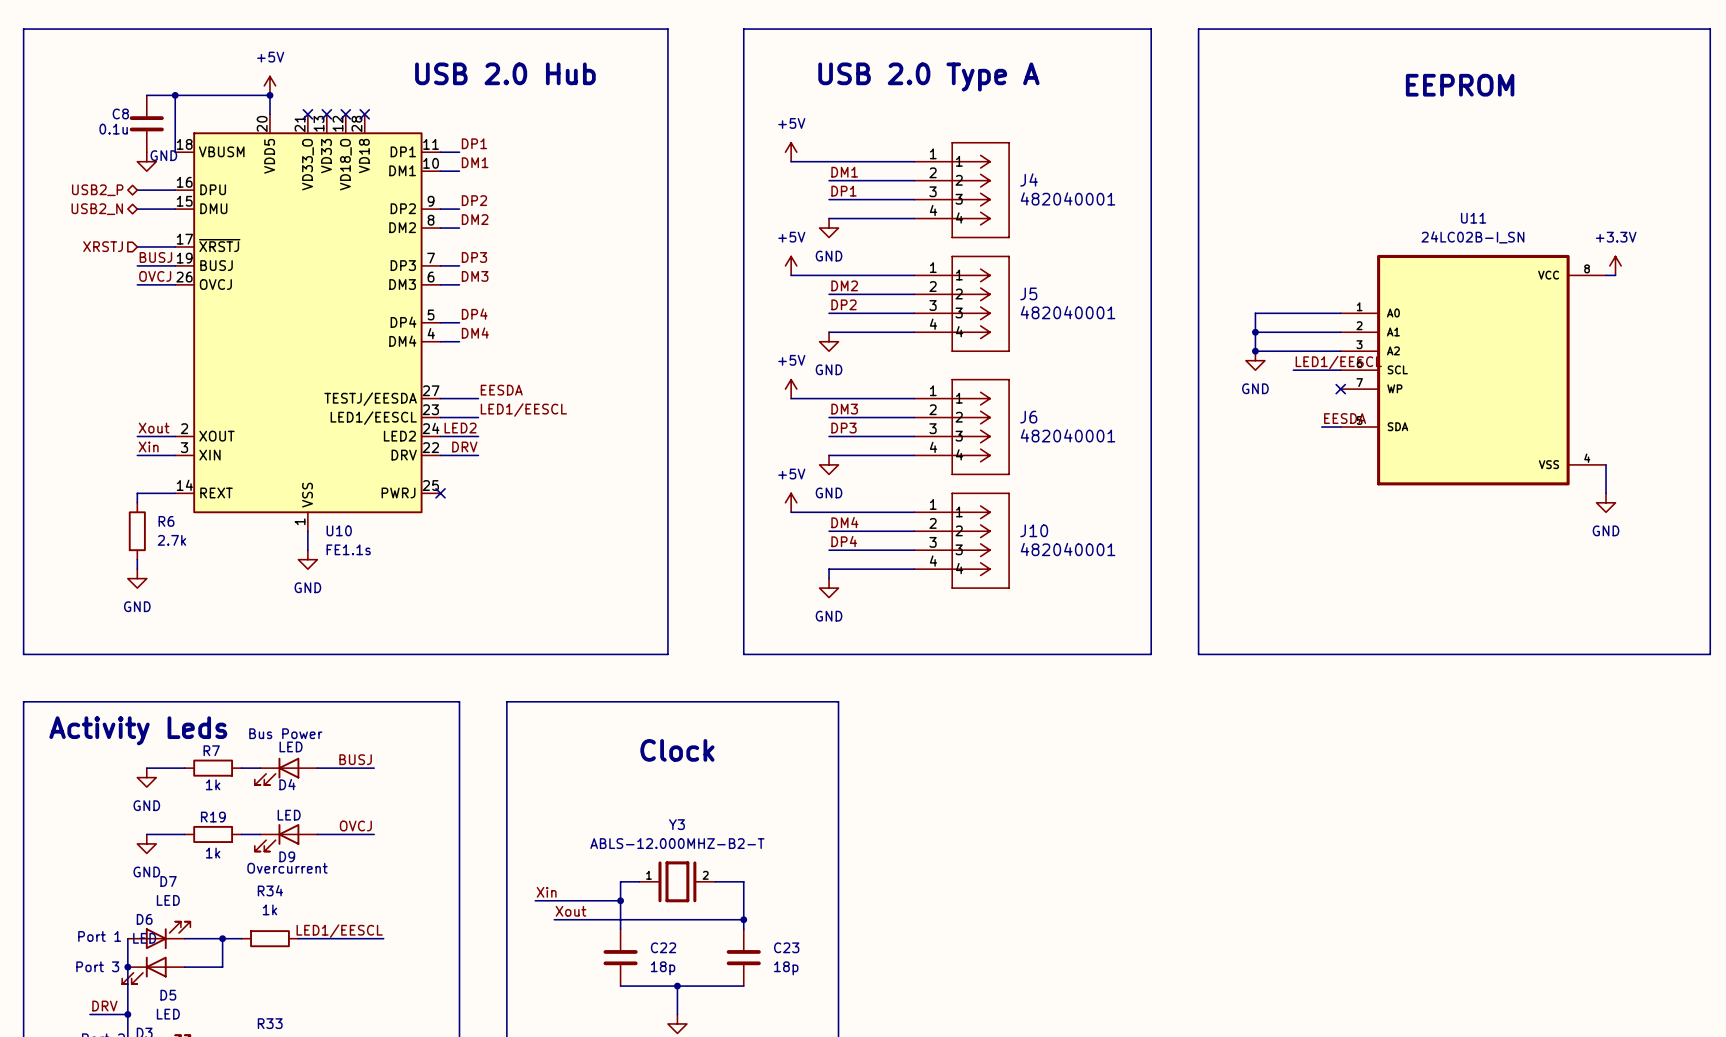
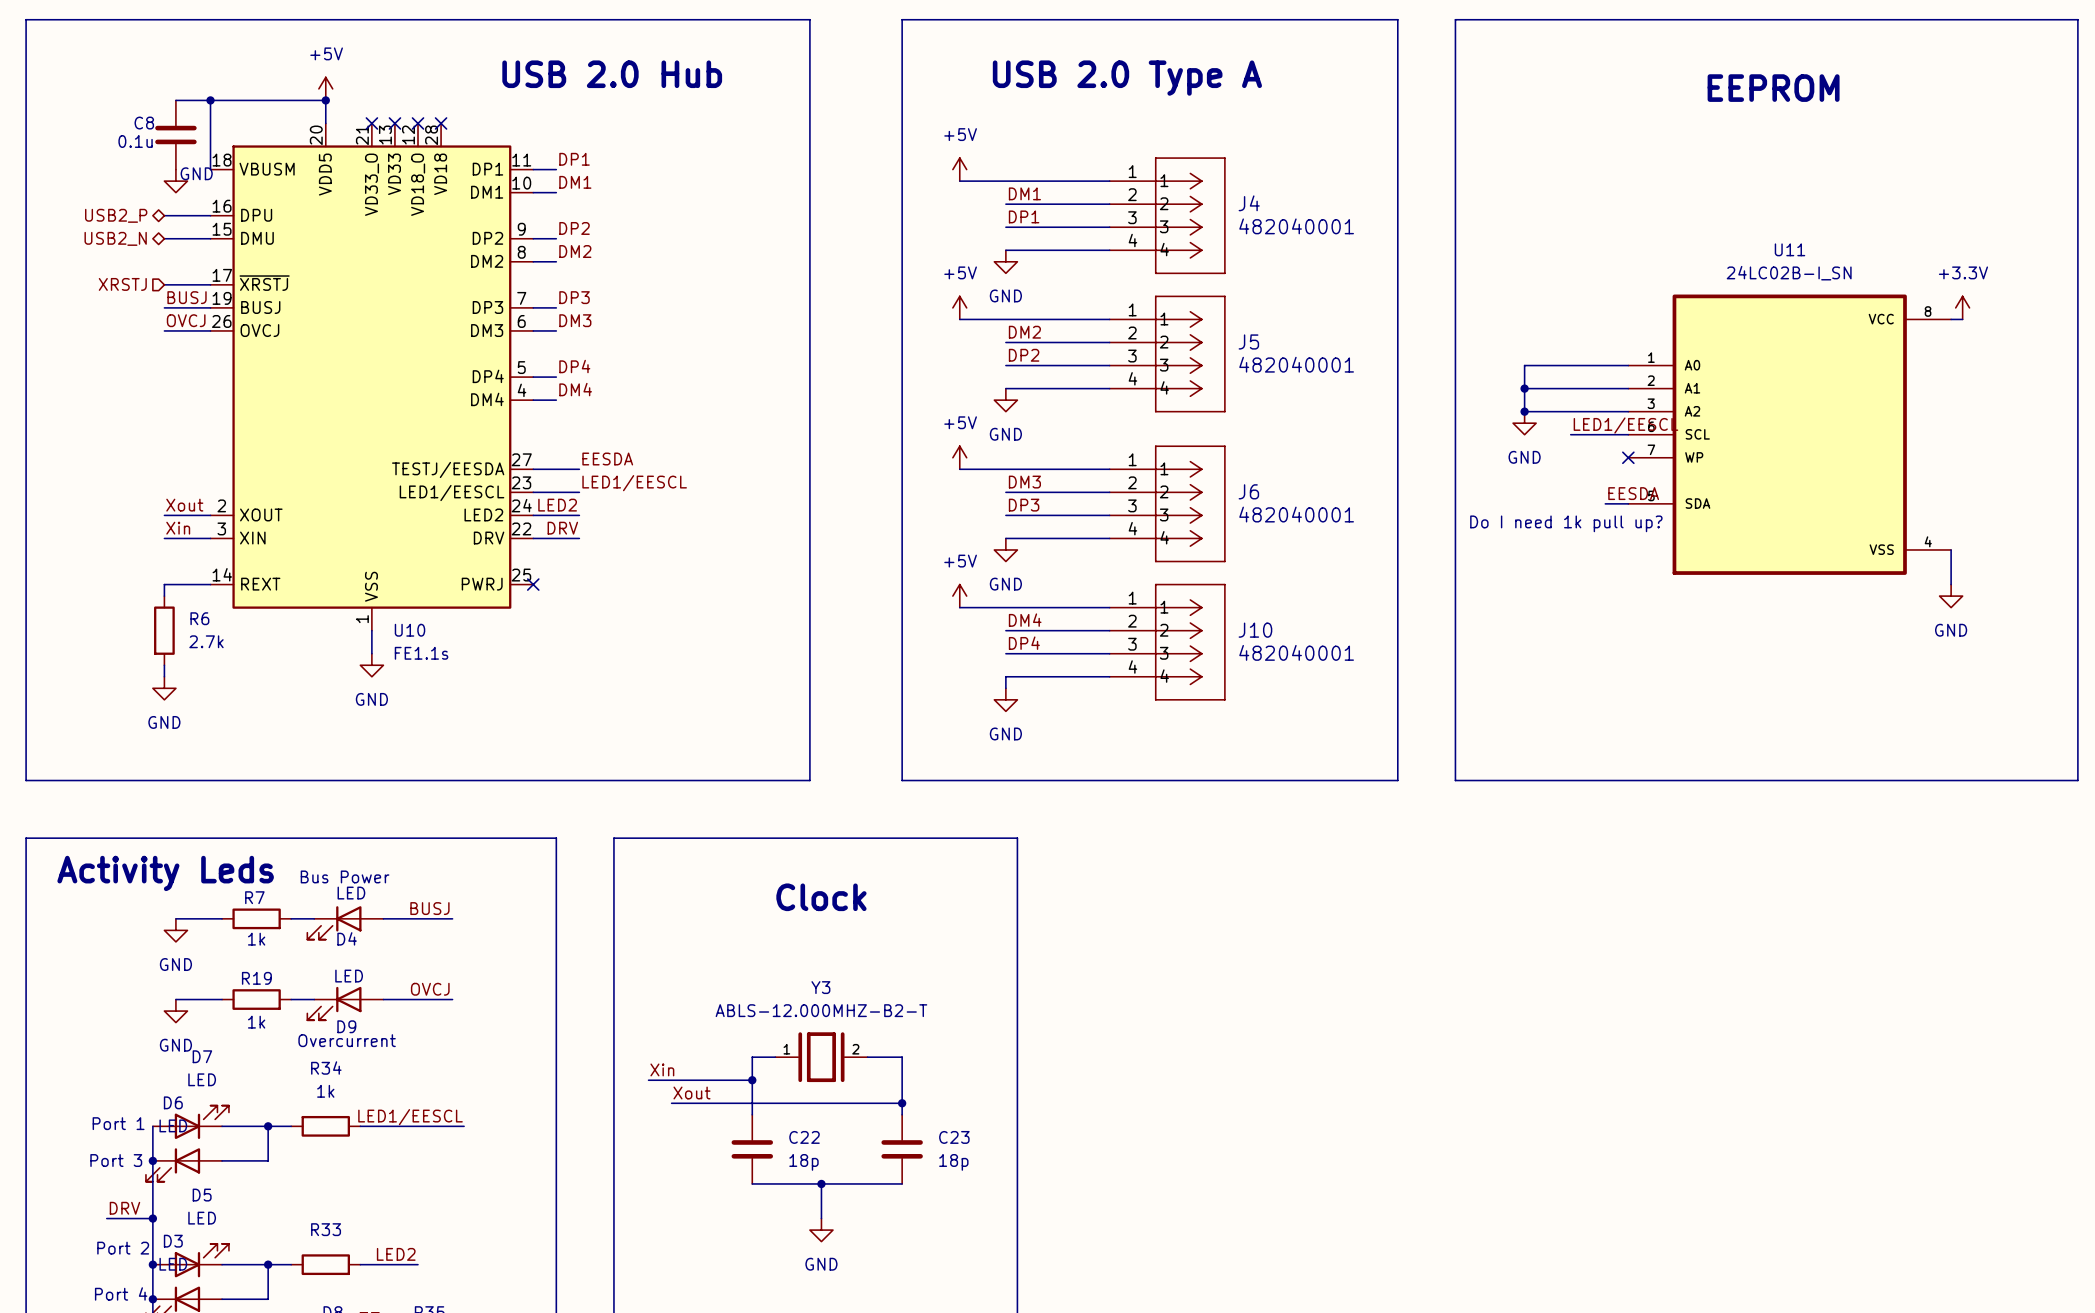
text: none -> Do I need 1k pull up? (1566, 523)

